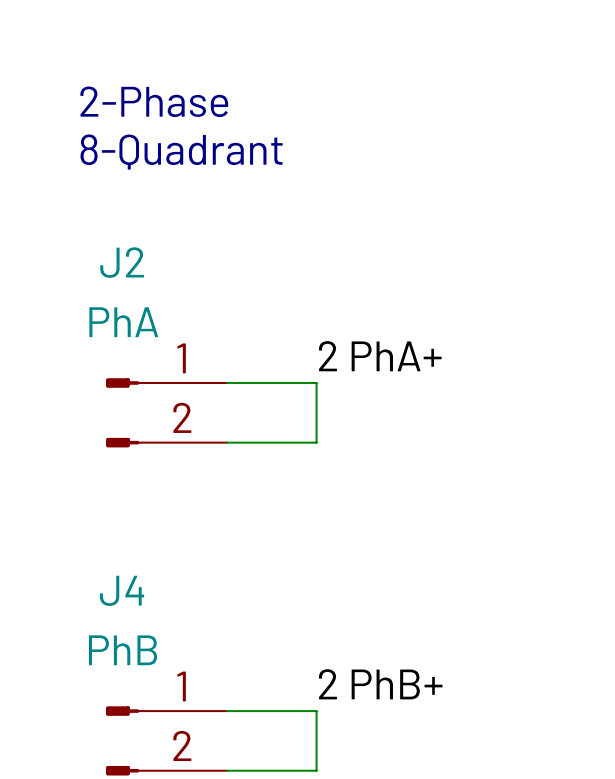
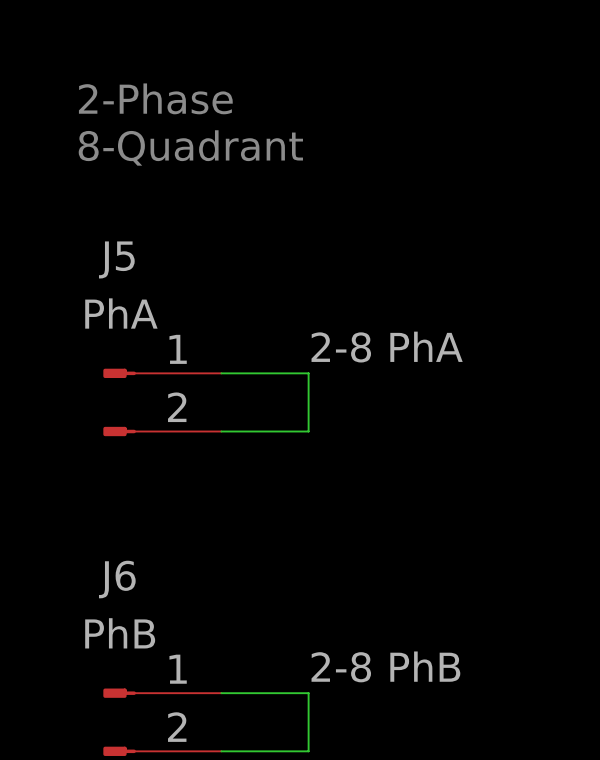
J2 name: J2 (122, 262) -> J5 (116, 259)
label: 2 PhA+ (380, 356) -> 2-8 PhA (387, 347)
J4 name: J4 (122, 590) -> J6 (117, 579)
label: 2 PhB+ (380, 684) -> 2-8 PhB (385, 666)

